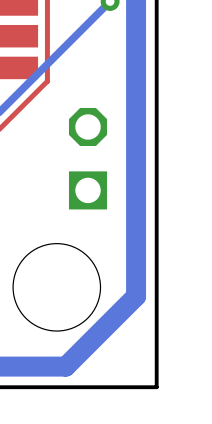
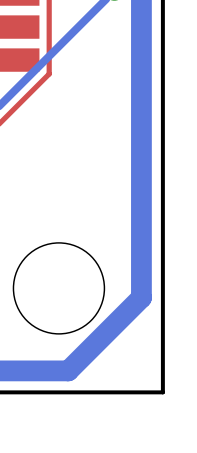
part: (88, 158) -> none

